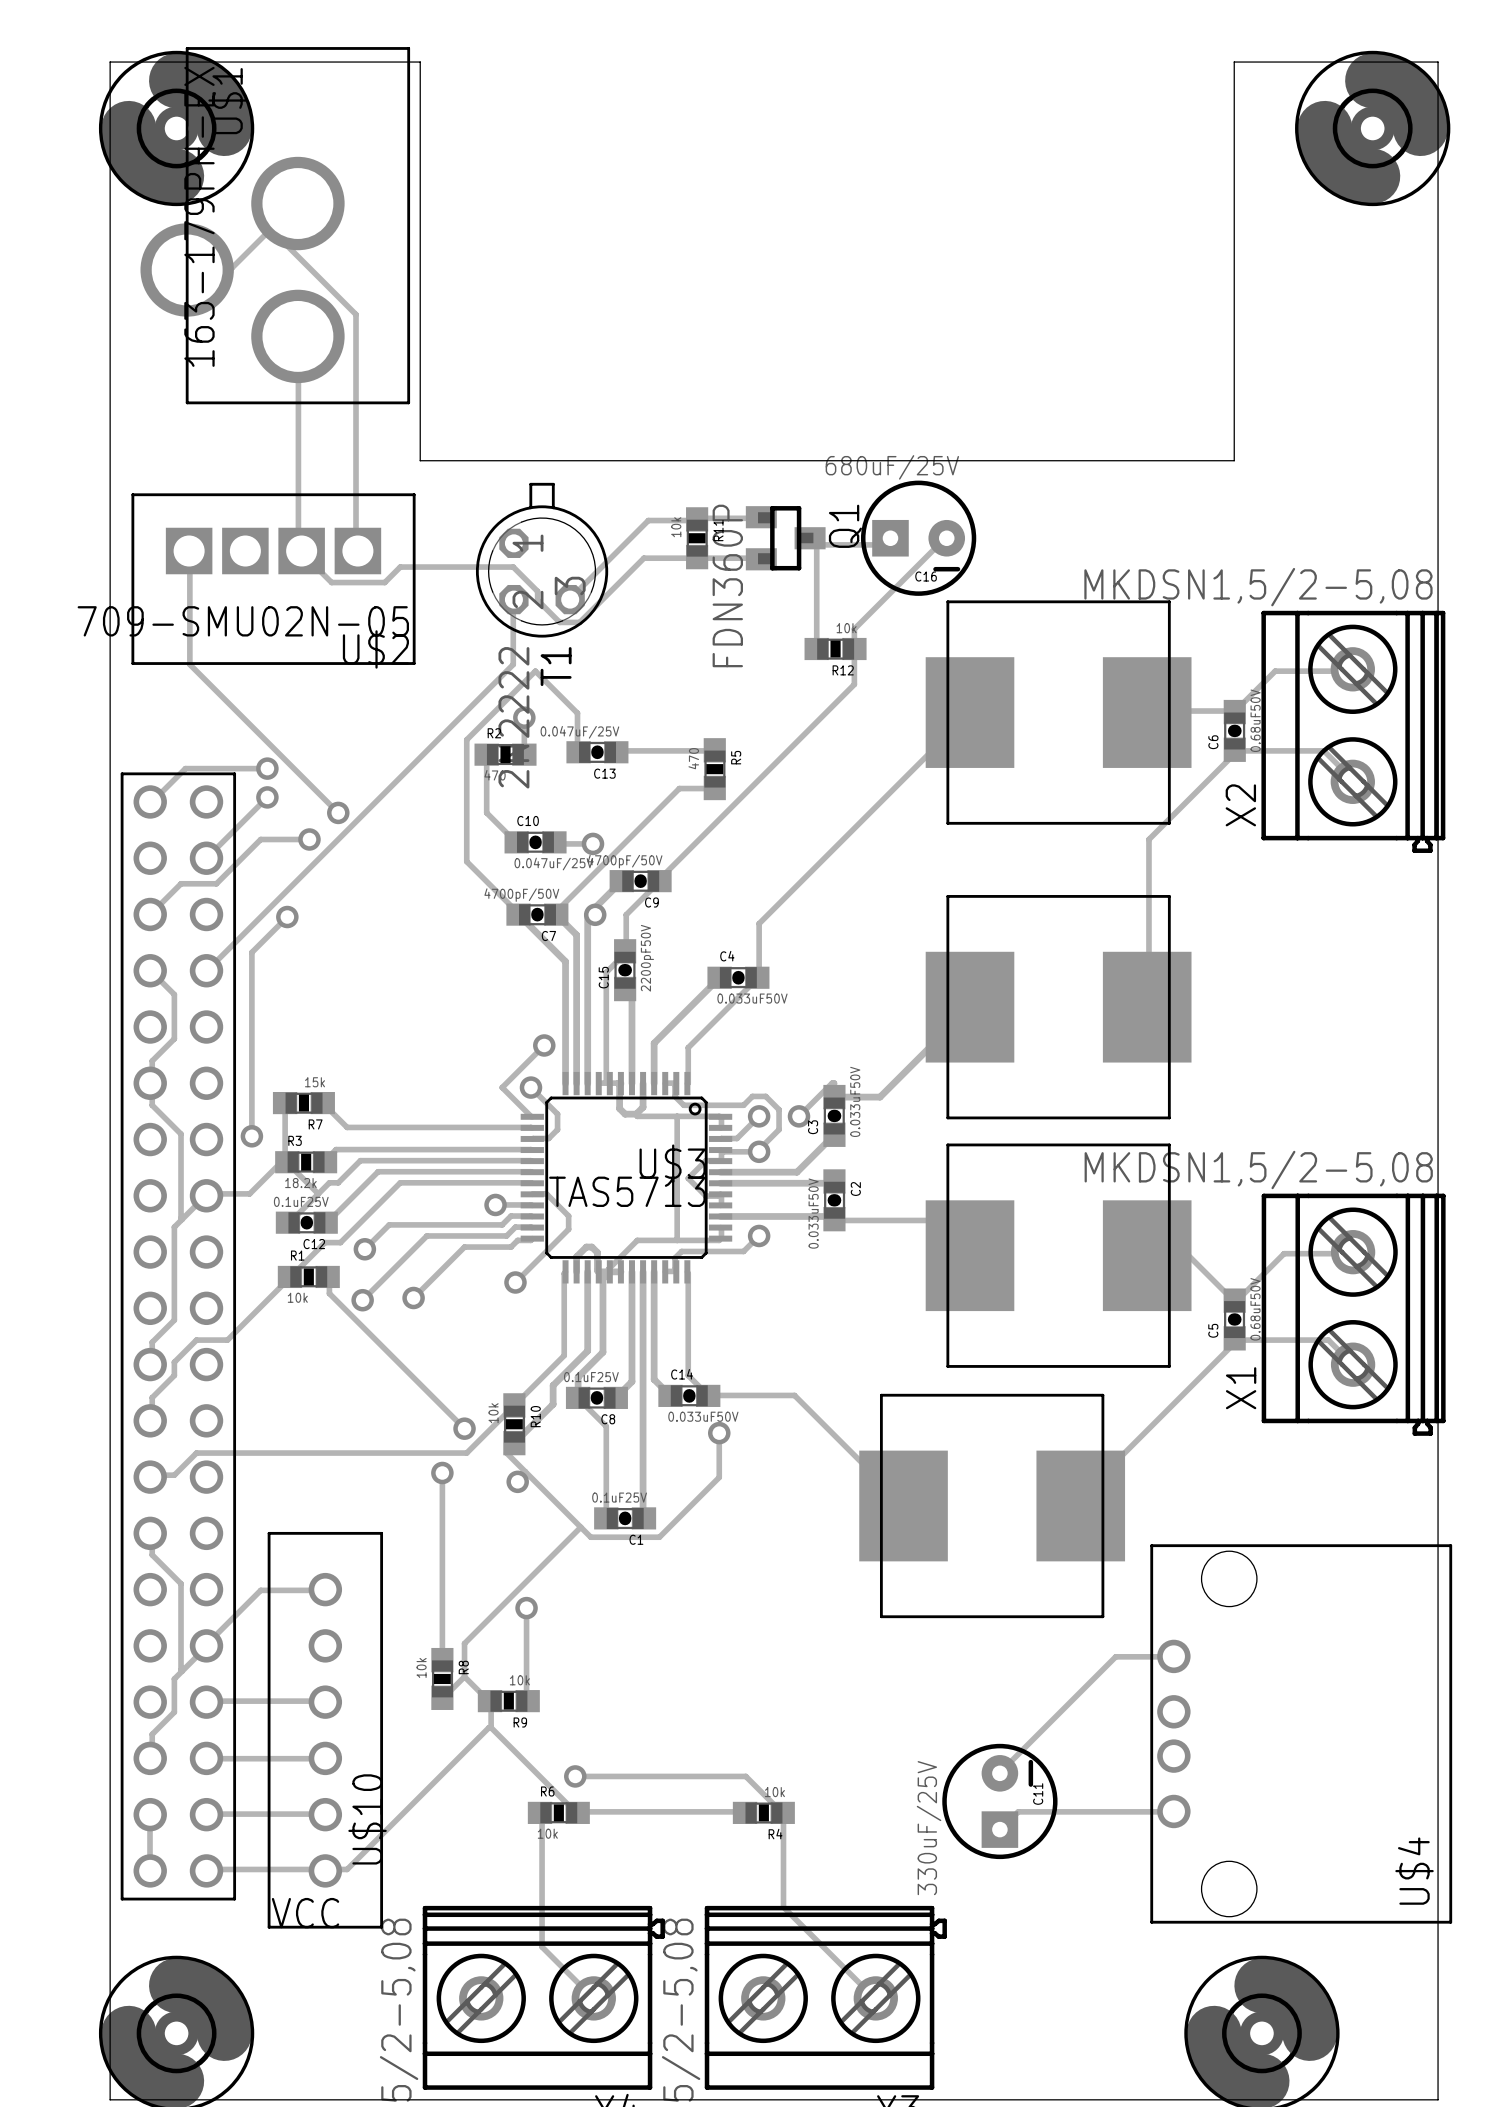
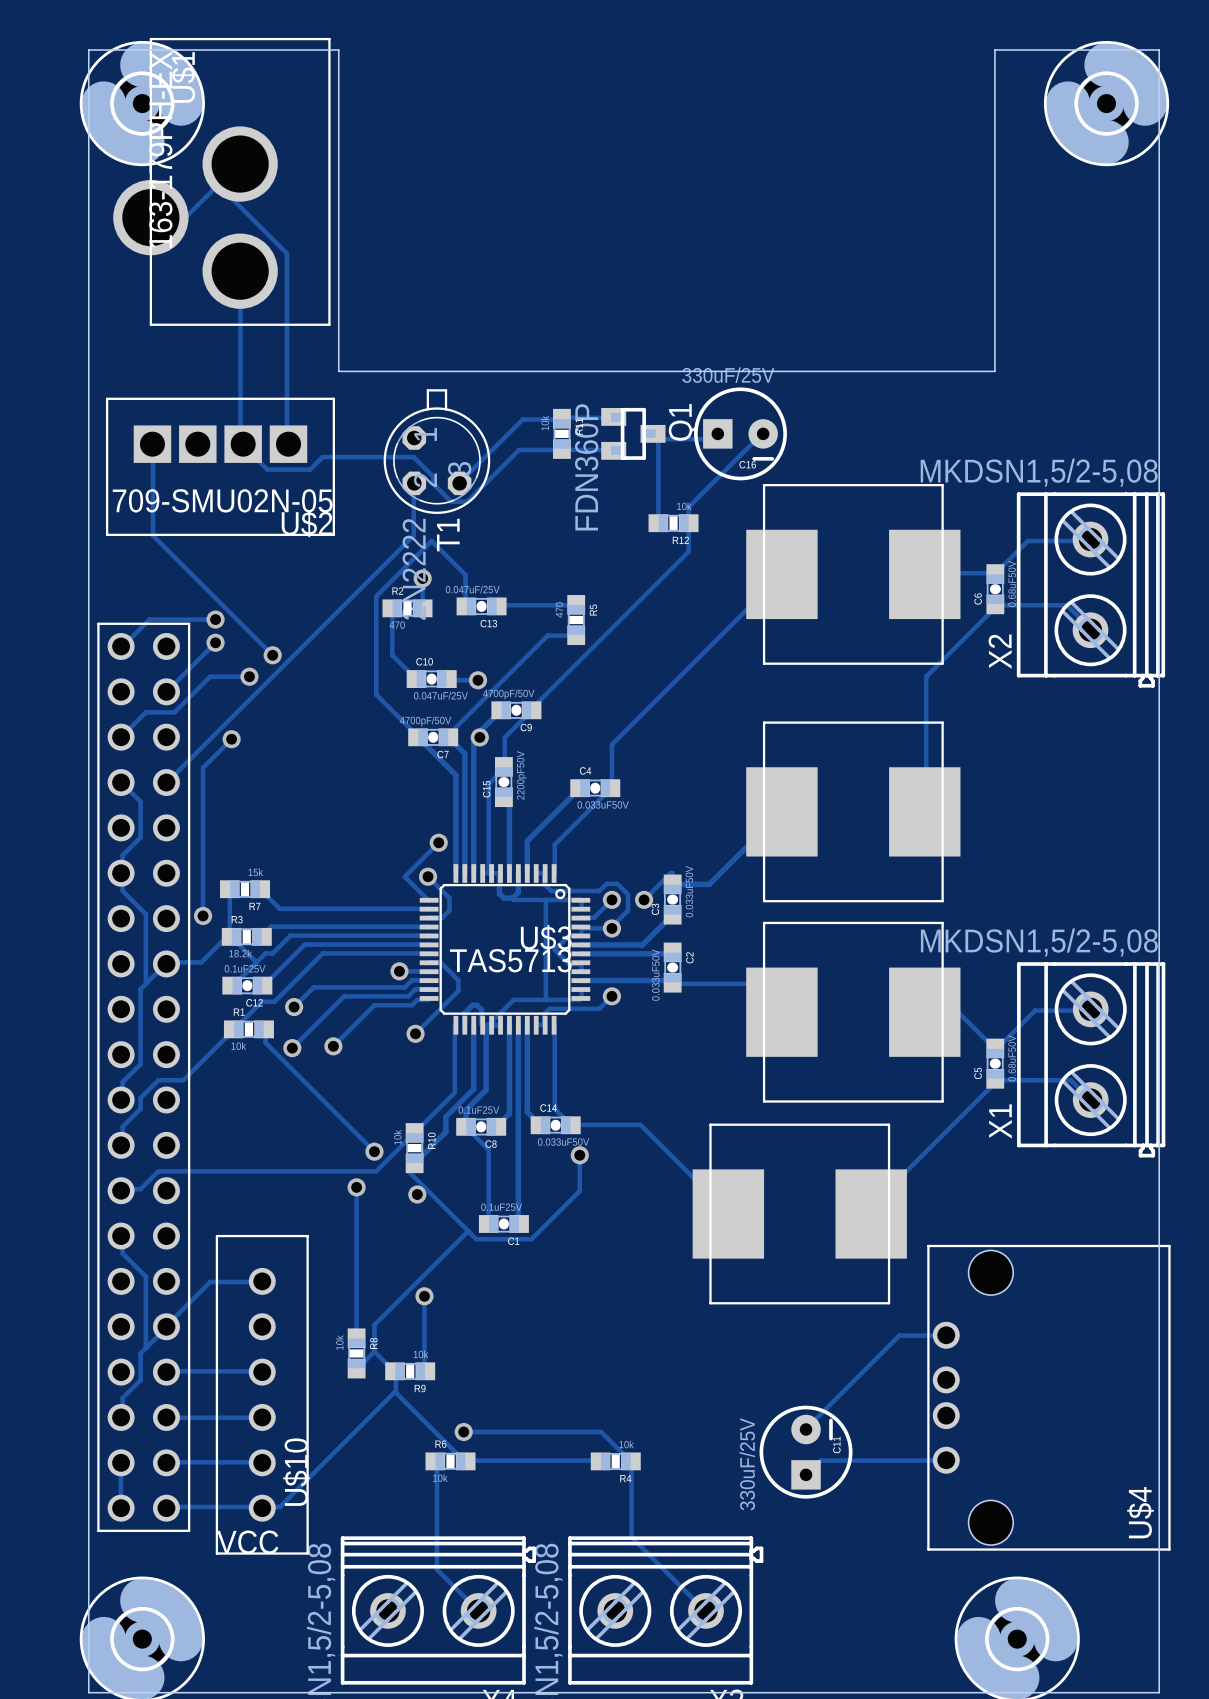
C16 value: 680uF/25V (892, 467) -> 330uF/25V (728, 375)

